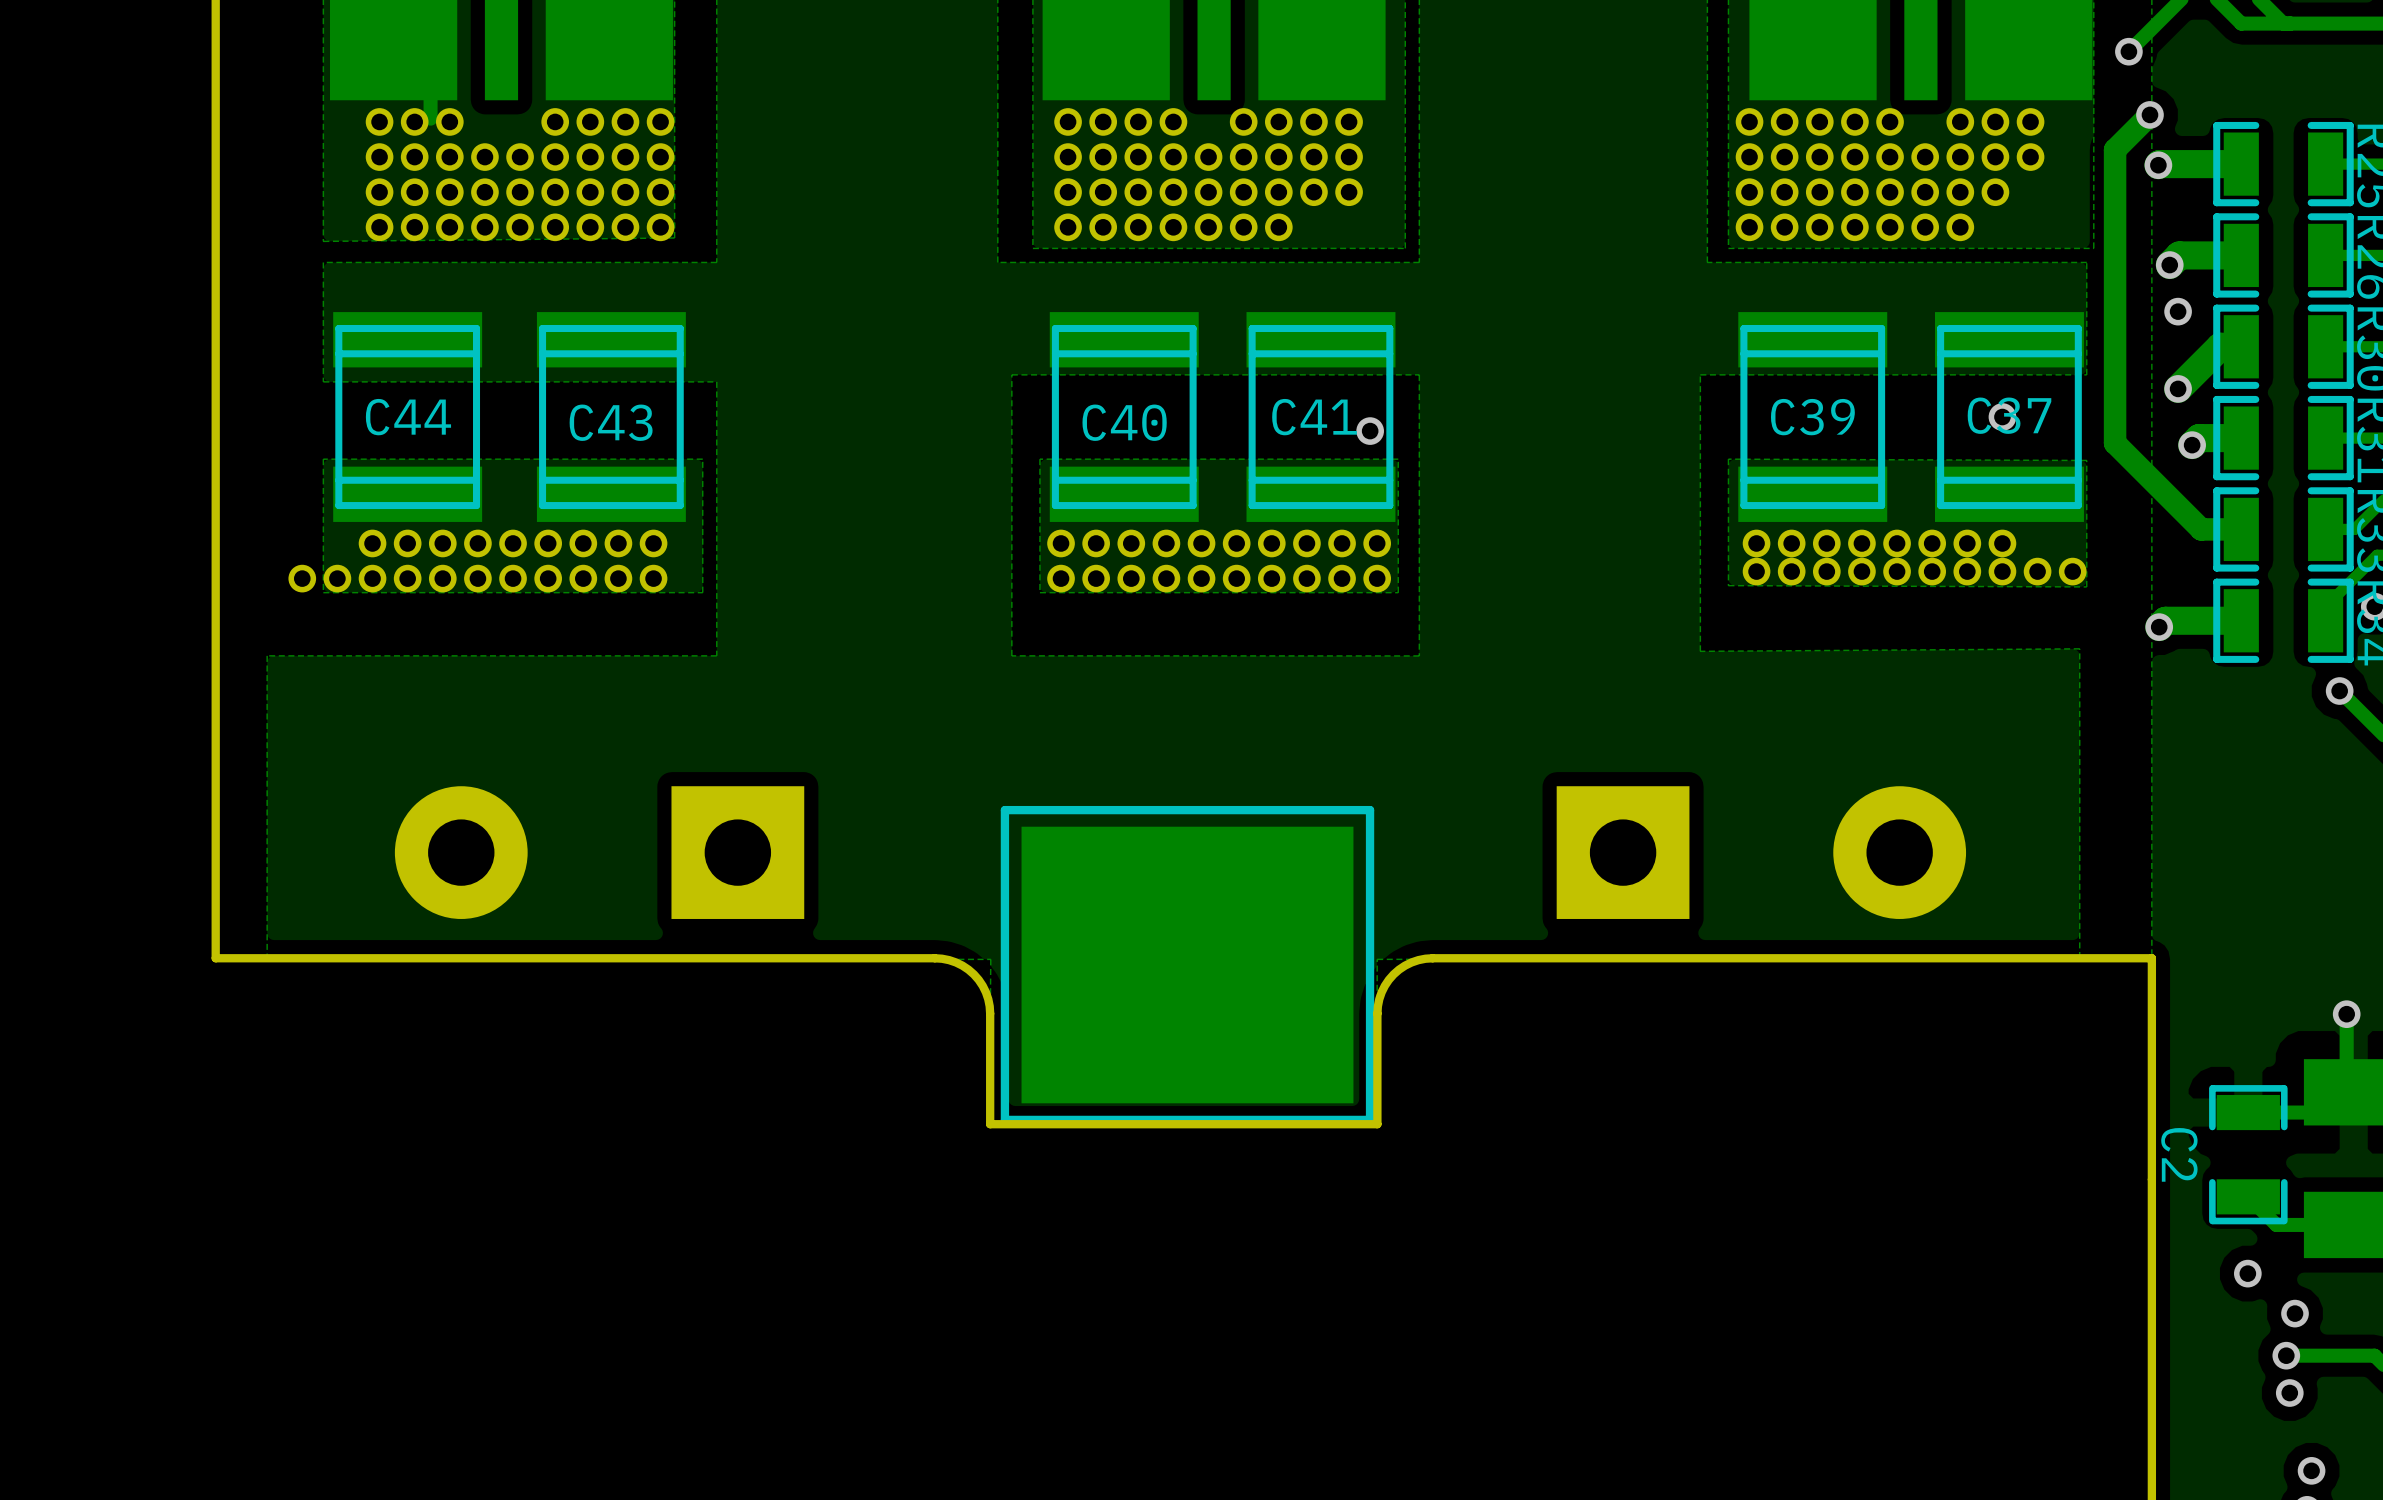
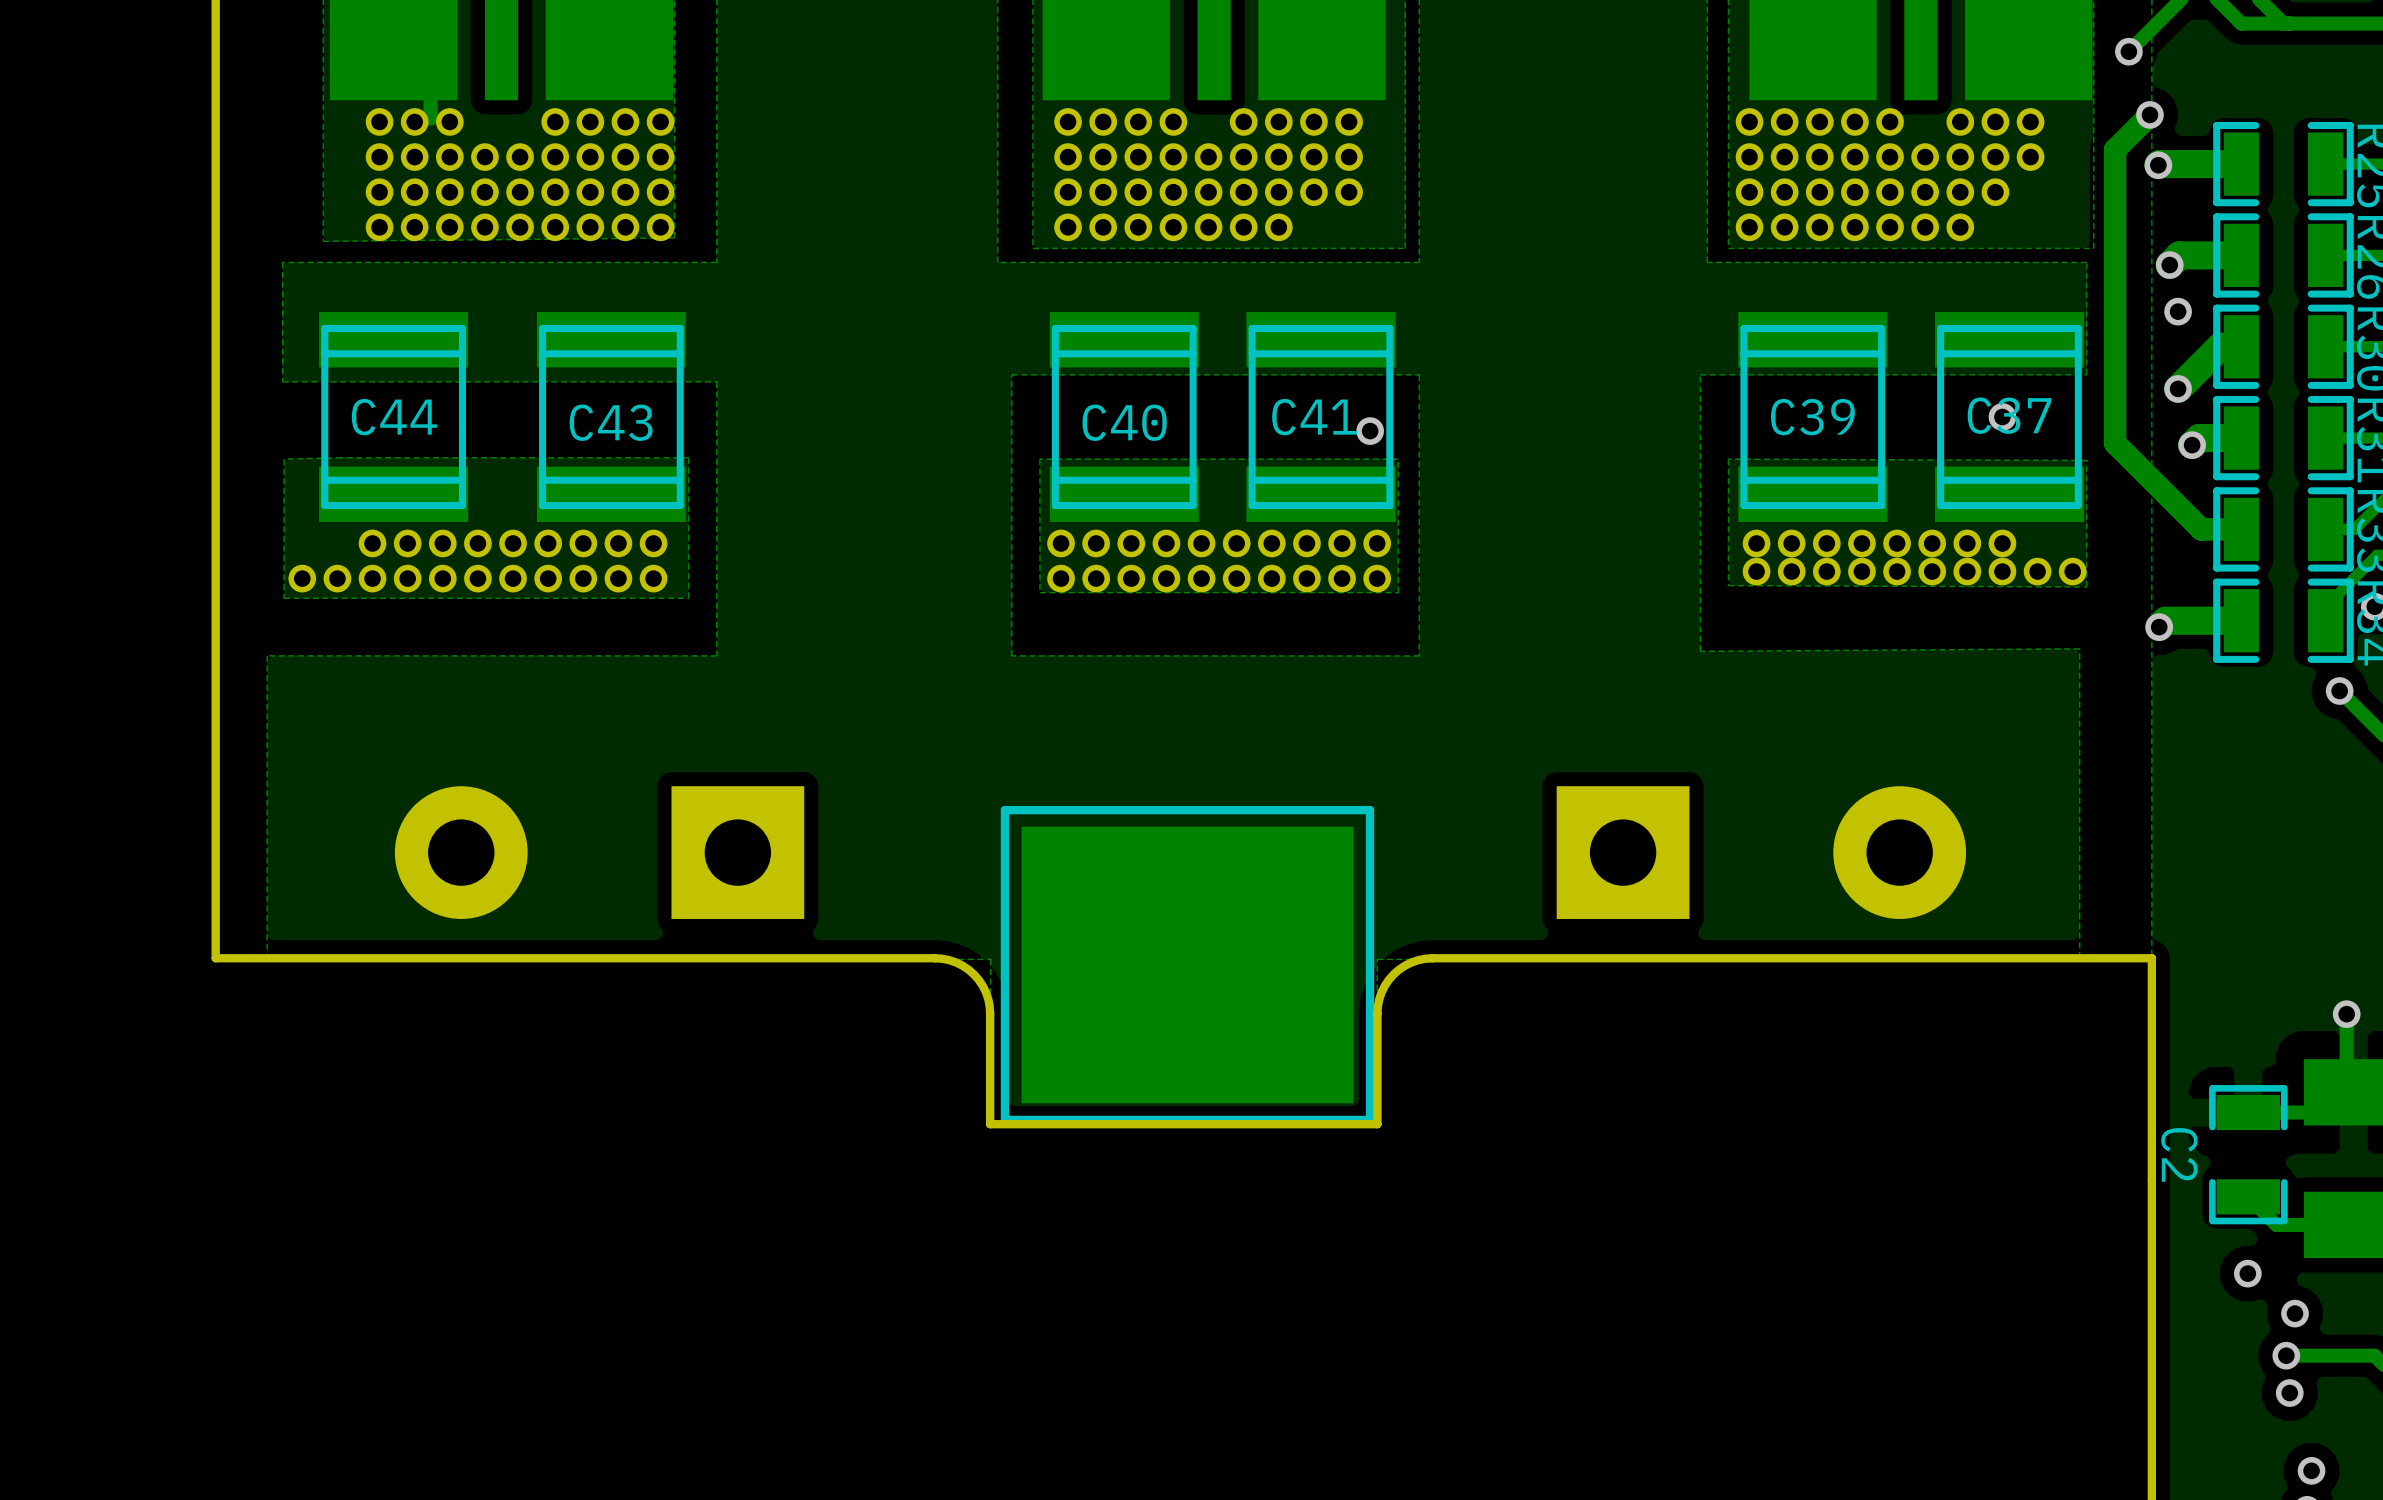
zone outline: (323, 262) (323, 381) -> (323, 262) (282, 262) (282, 381) (323, 381)
C44 position: (407, 417) -> (393, 417)
zone outline: (702, 459) (323, 459) (323, 592) (702, 592) (702, 459) -> (688, 457) (688, 598) (284, 598) (284, 459) (688, 457)

